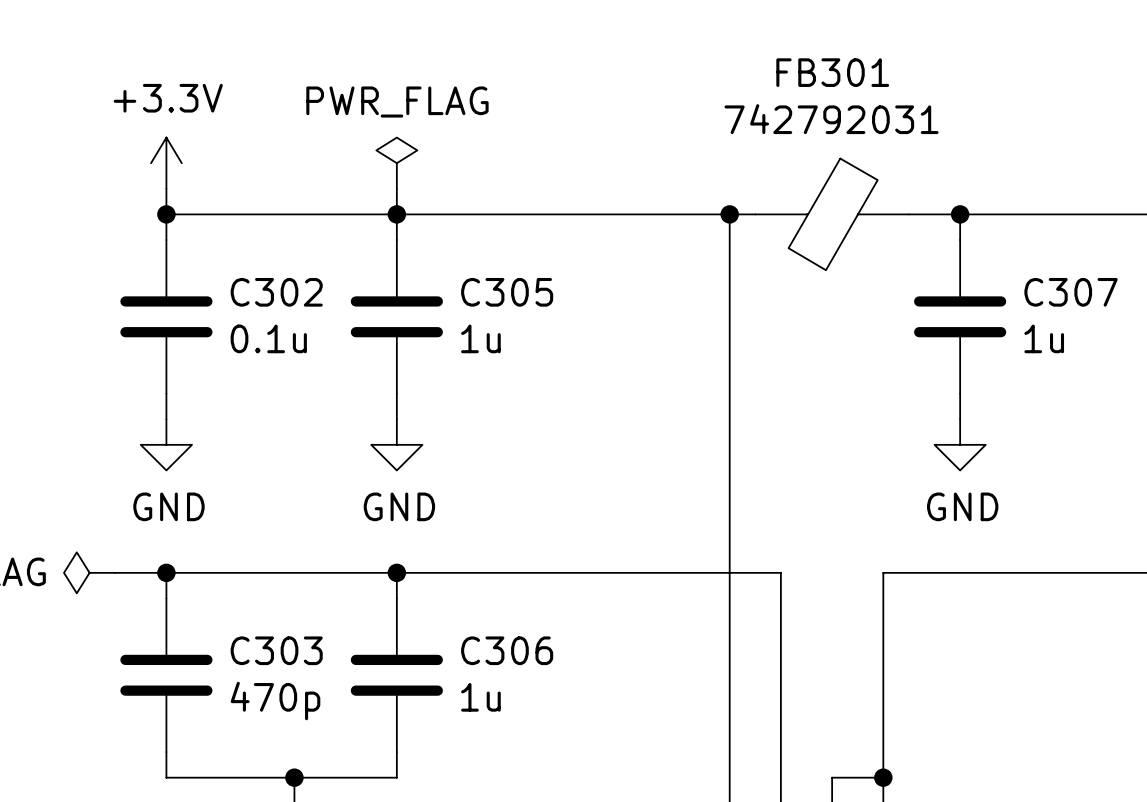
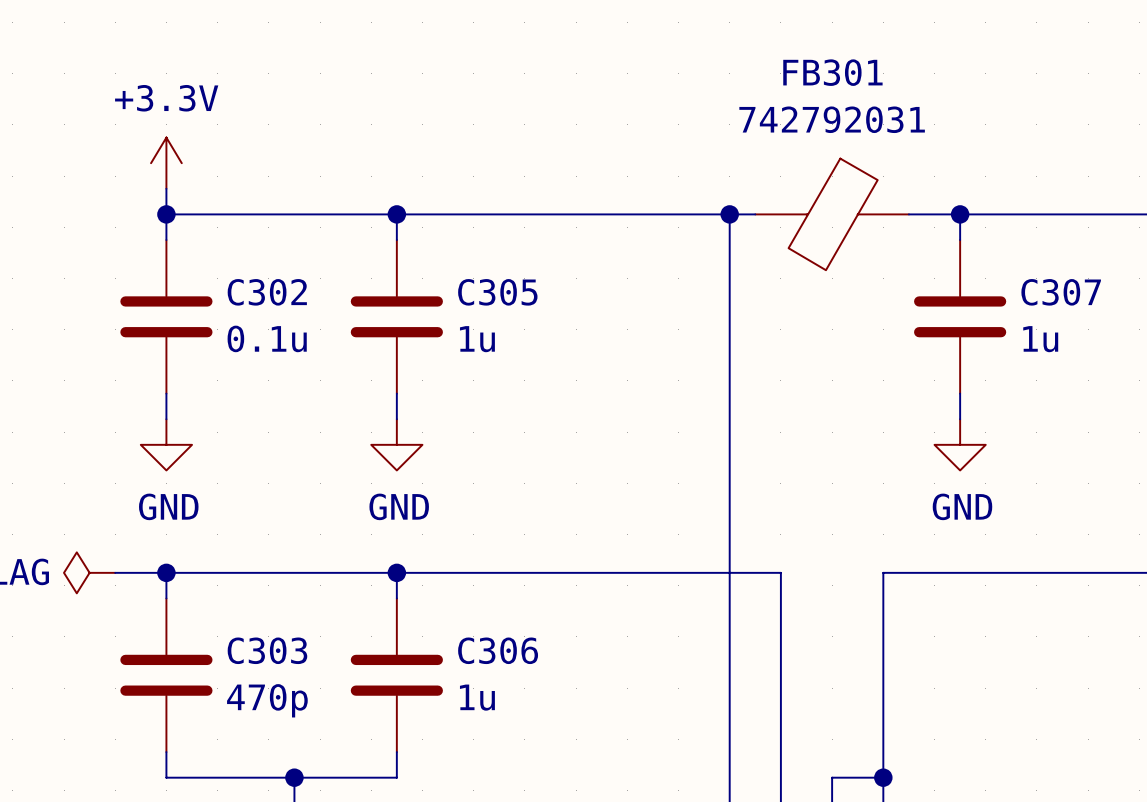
power symbol: PWR_FLAG (396, 163) -> none
wire: (396, 188) (396, 214) -> none

